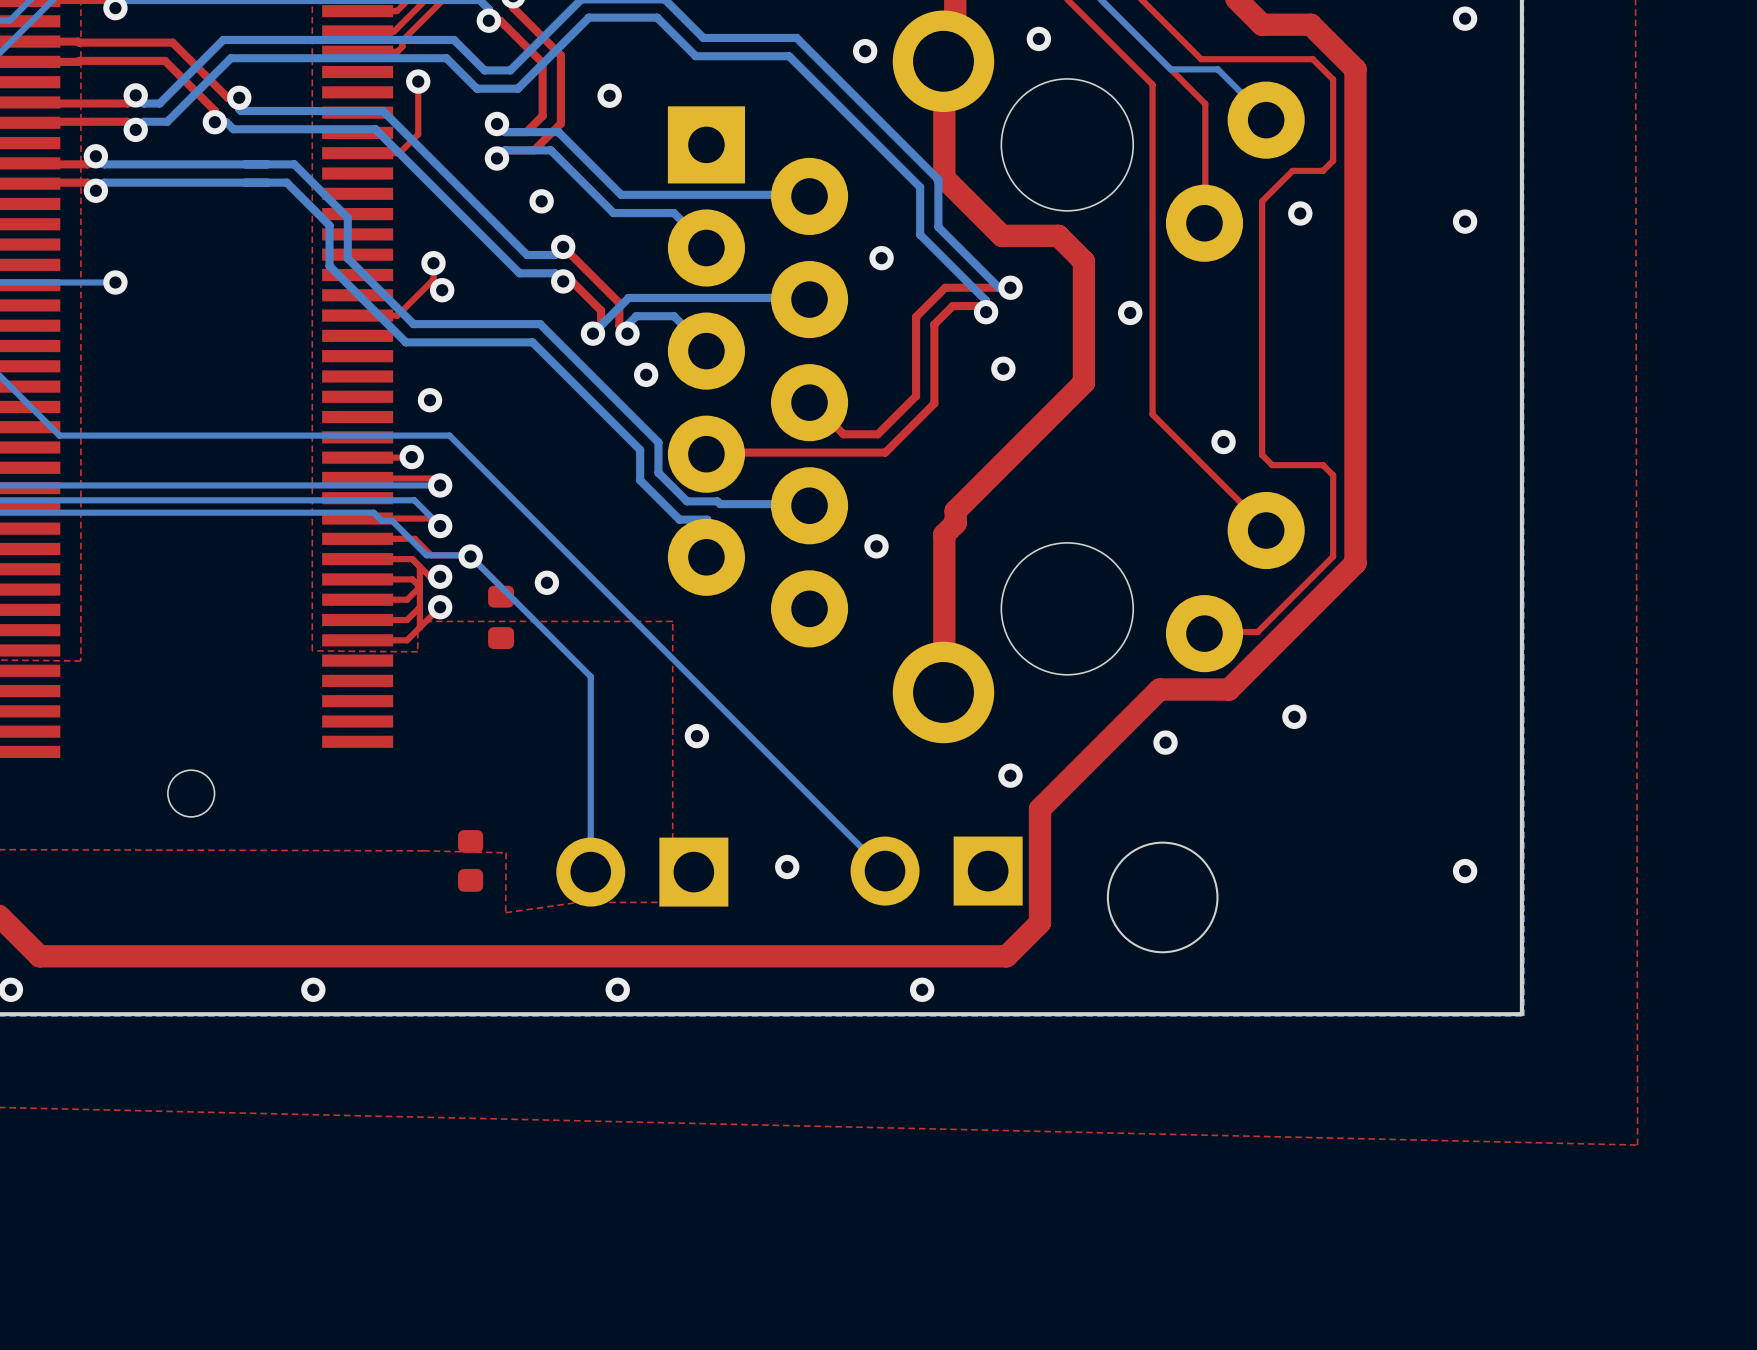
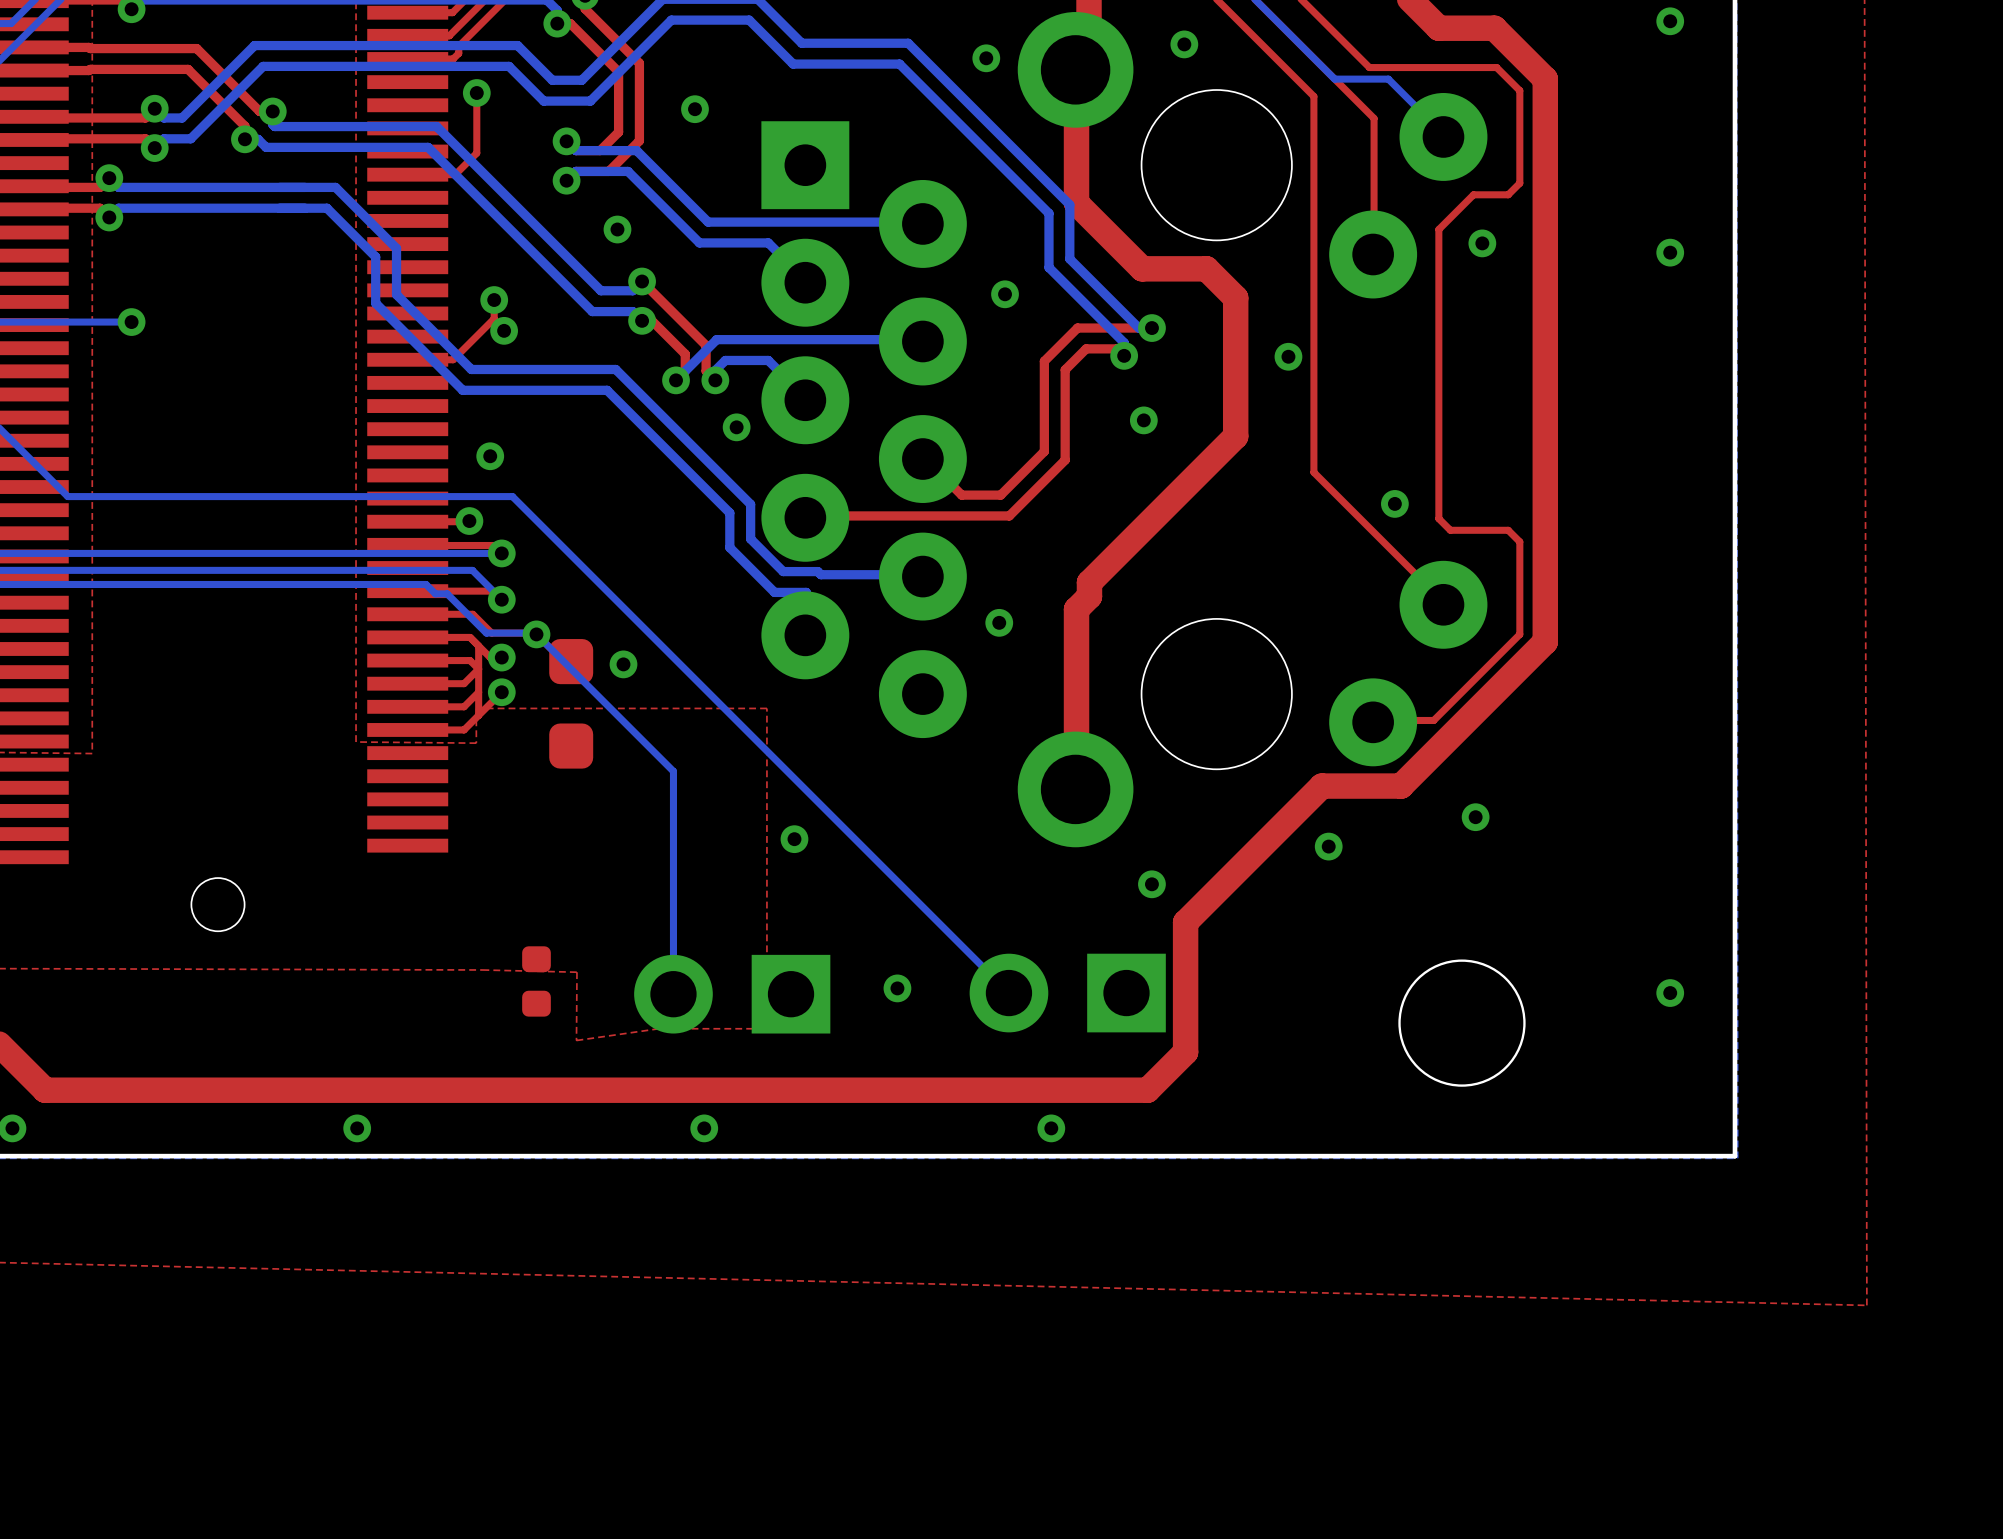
part footprint: [488, 585, 515, 650] -> [549, 639, 594, 769]
round board edge position: (1162, 897) -> (1461, 1023)

